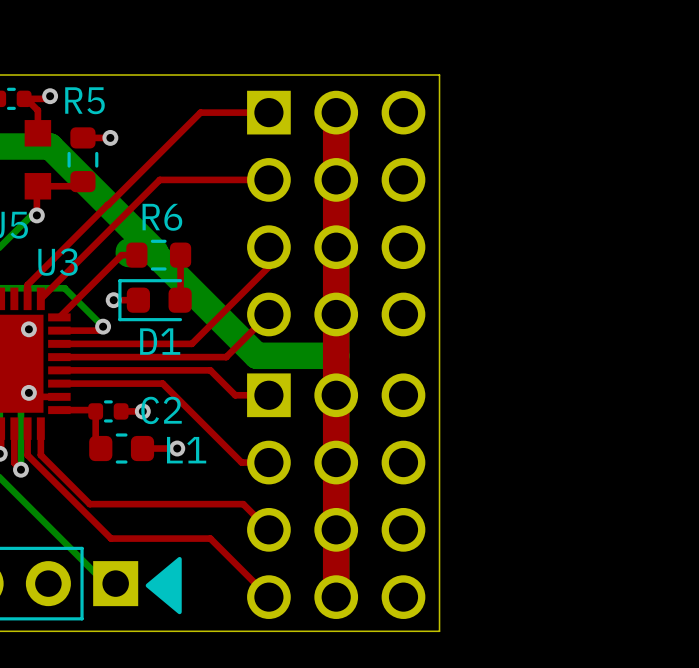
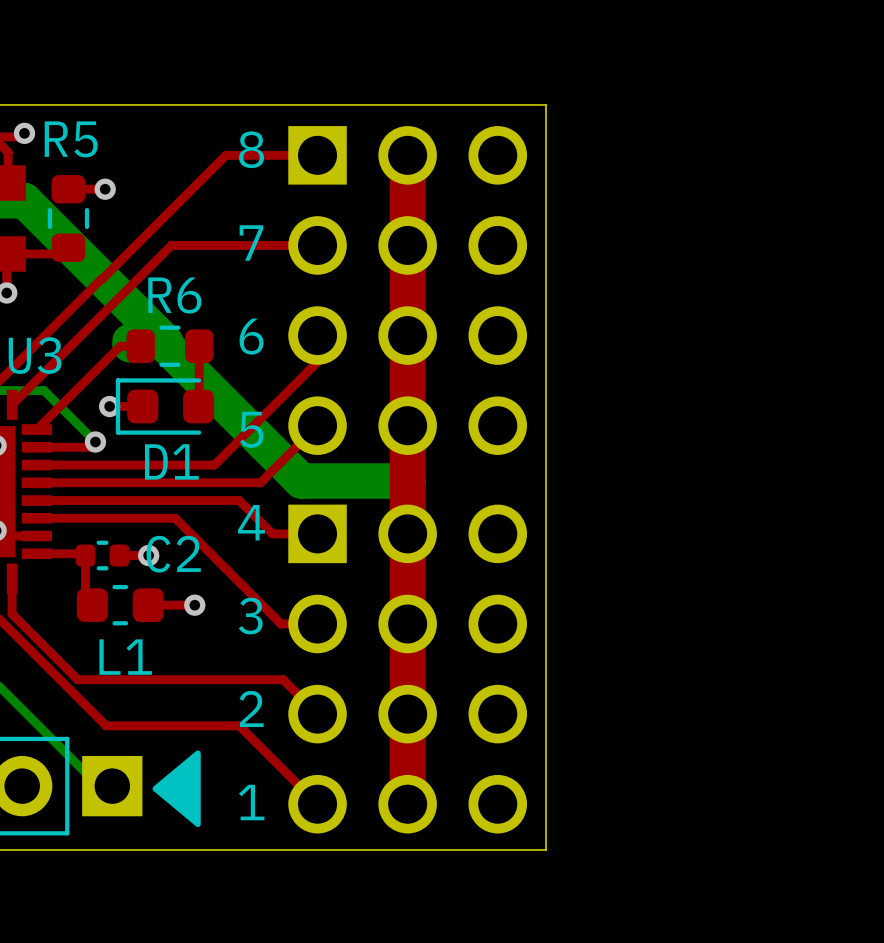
text: none -> 8 (251, 149)
text: none -> 7 (251, 243)
text: none -> 6 (251, 336)
text: none -> 5 (251, 429)
text: none -> 4 (251, 522)
L1 name position: L1 (186, 450) -> L1 (125, 657)
text: none -> 3 (250, 616)
text: none -> 2 (251, 708)
text: none -> 1 (251, 802)

